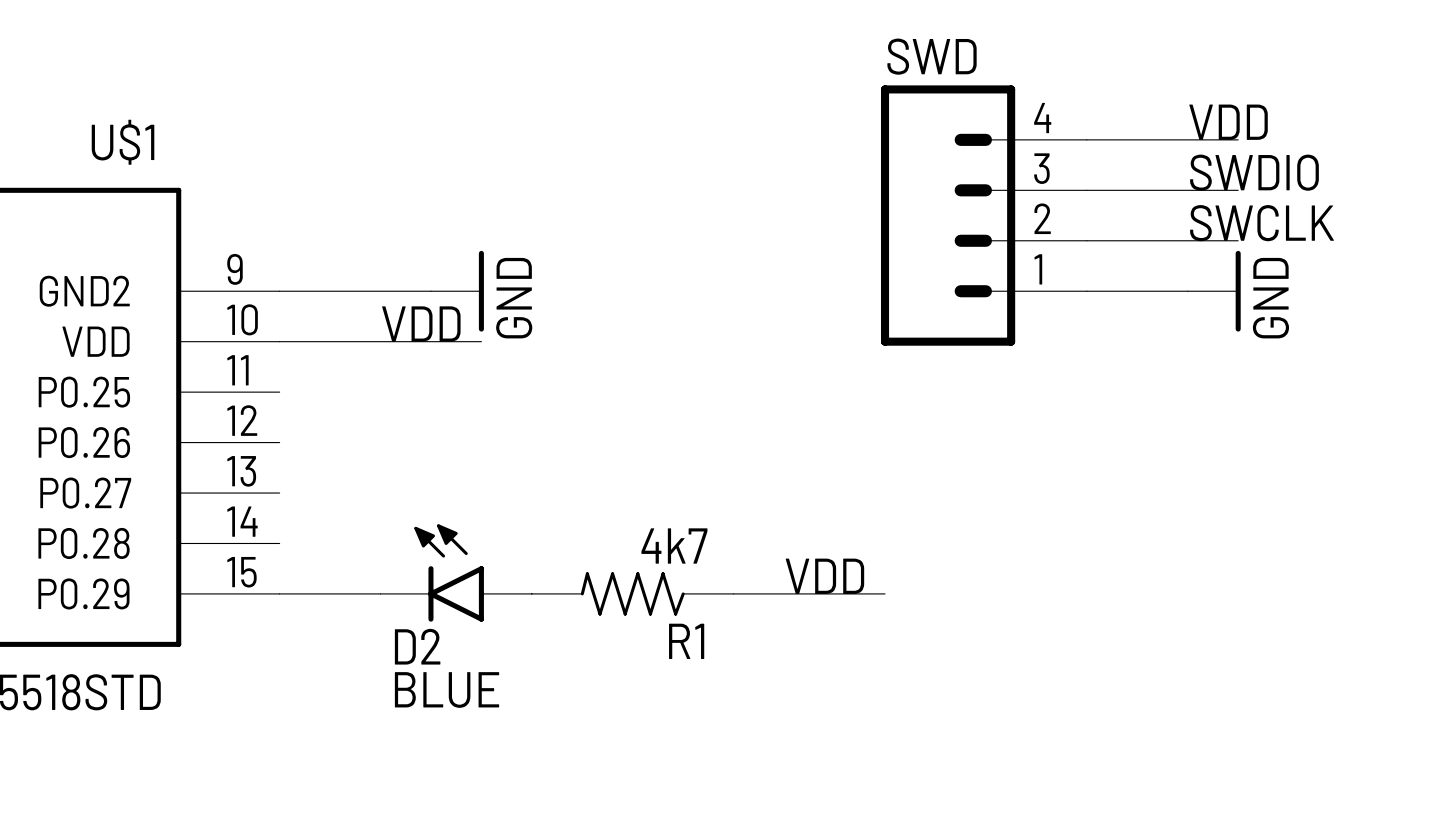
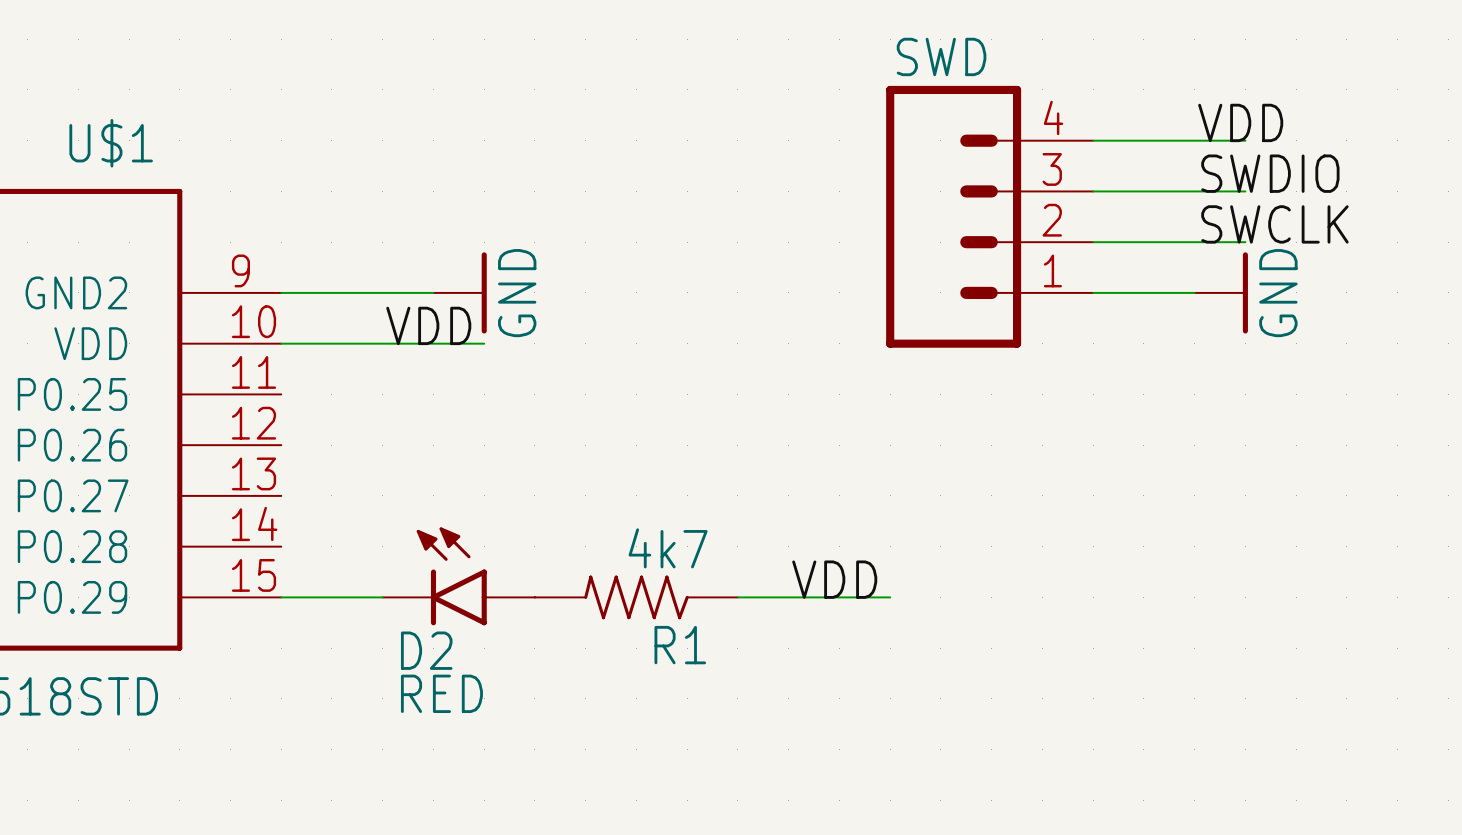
D2 value: BLUE (447, 689) -> RED (441, 693)

